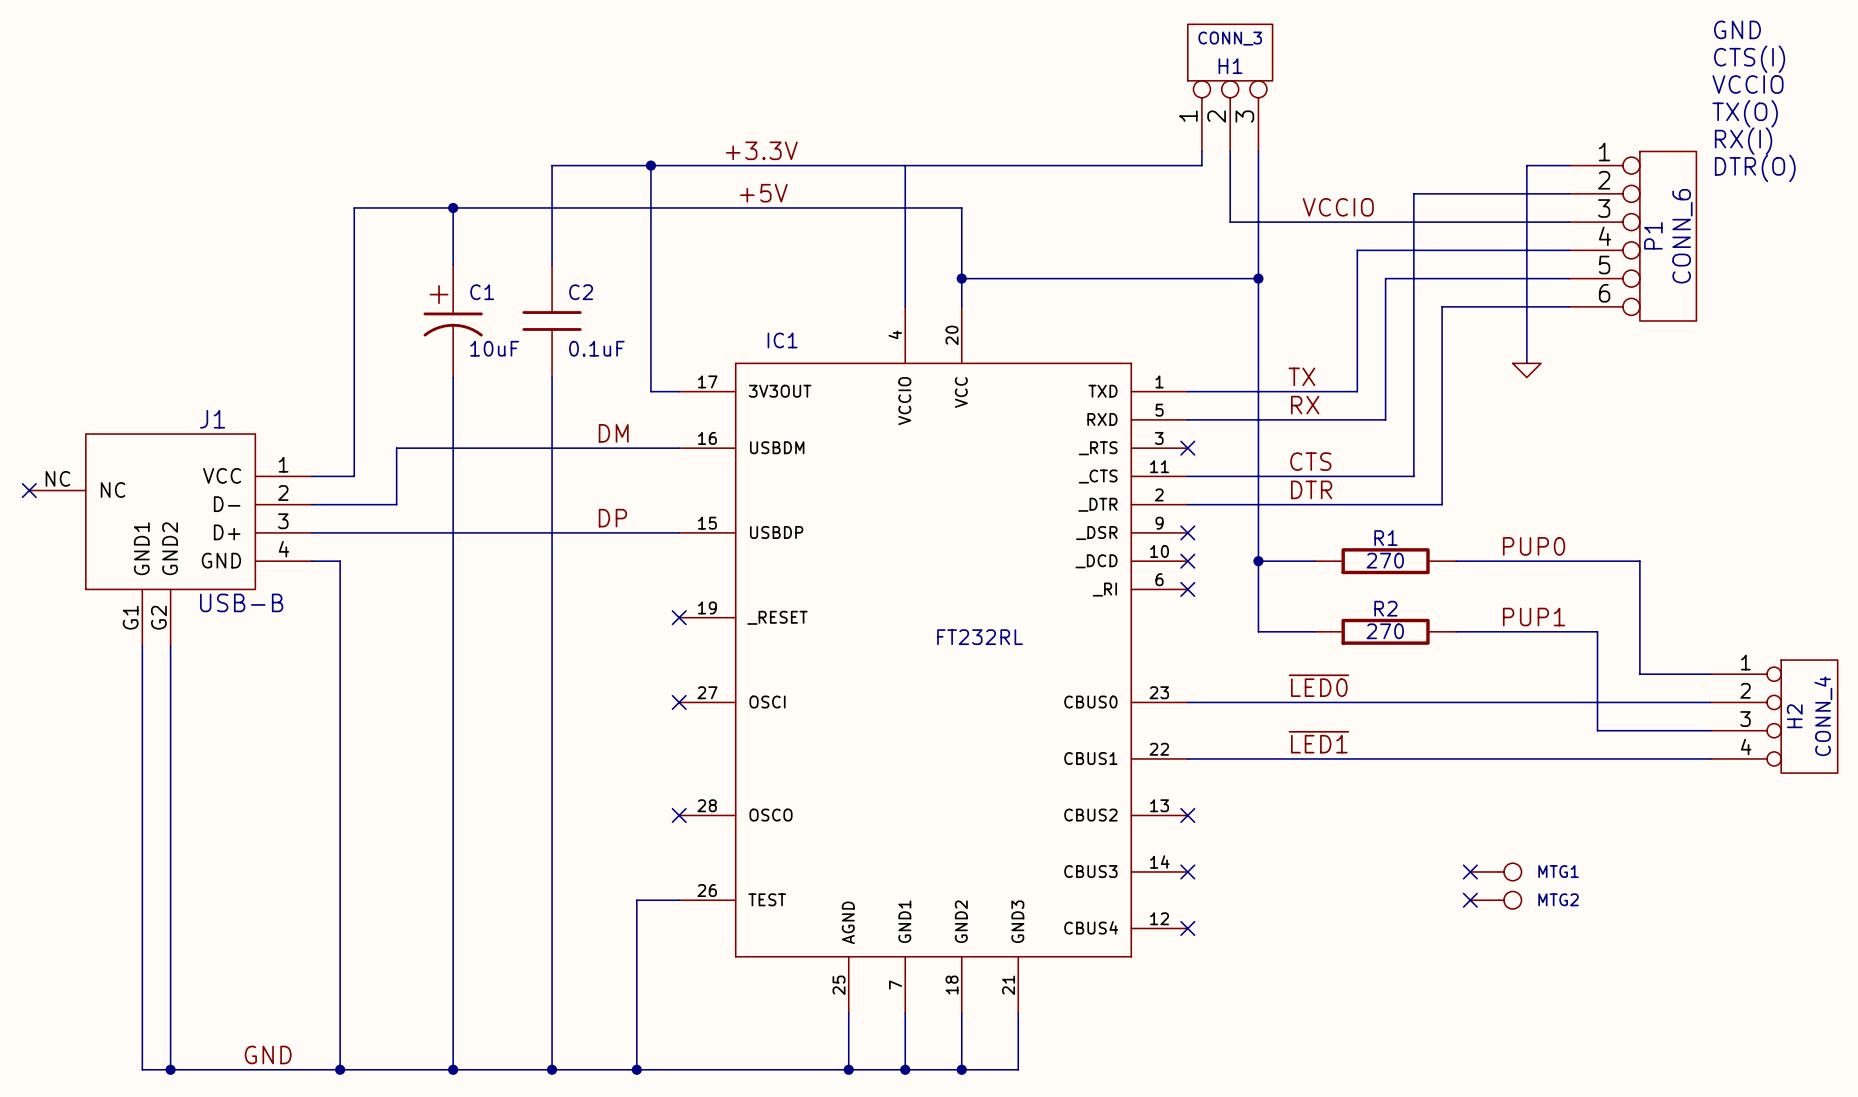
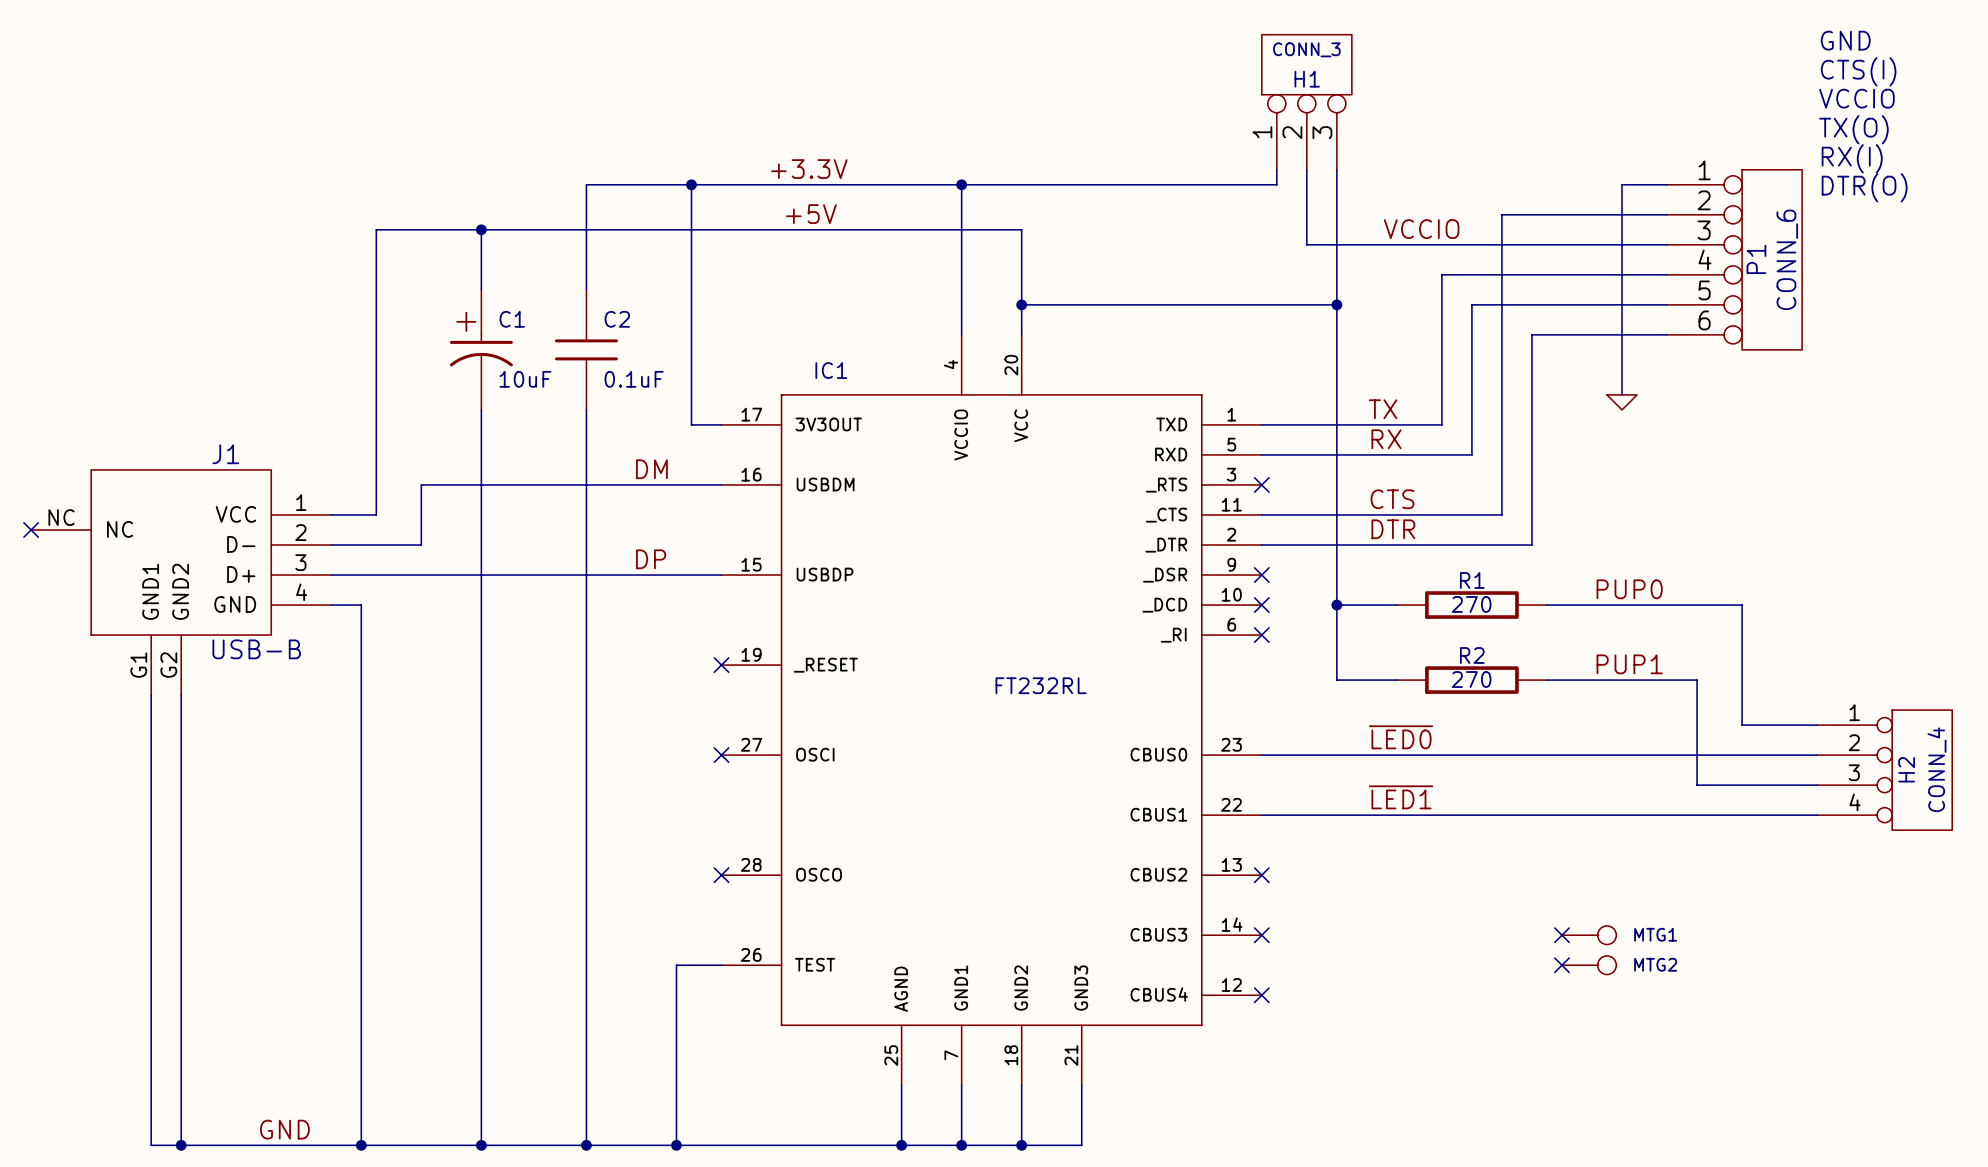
junction: none -> (961, 184)

